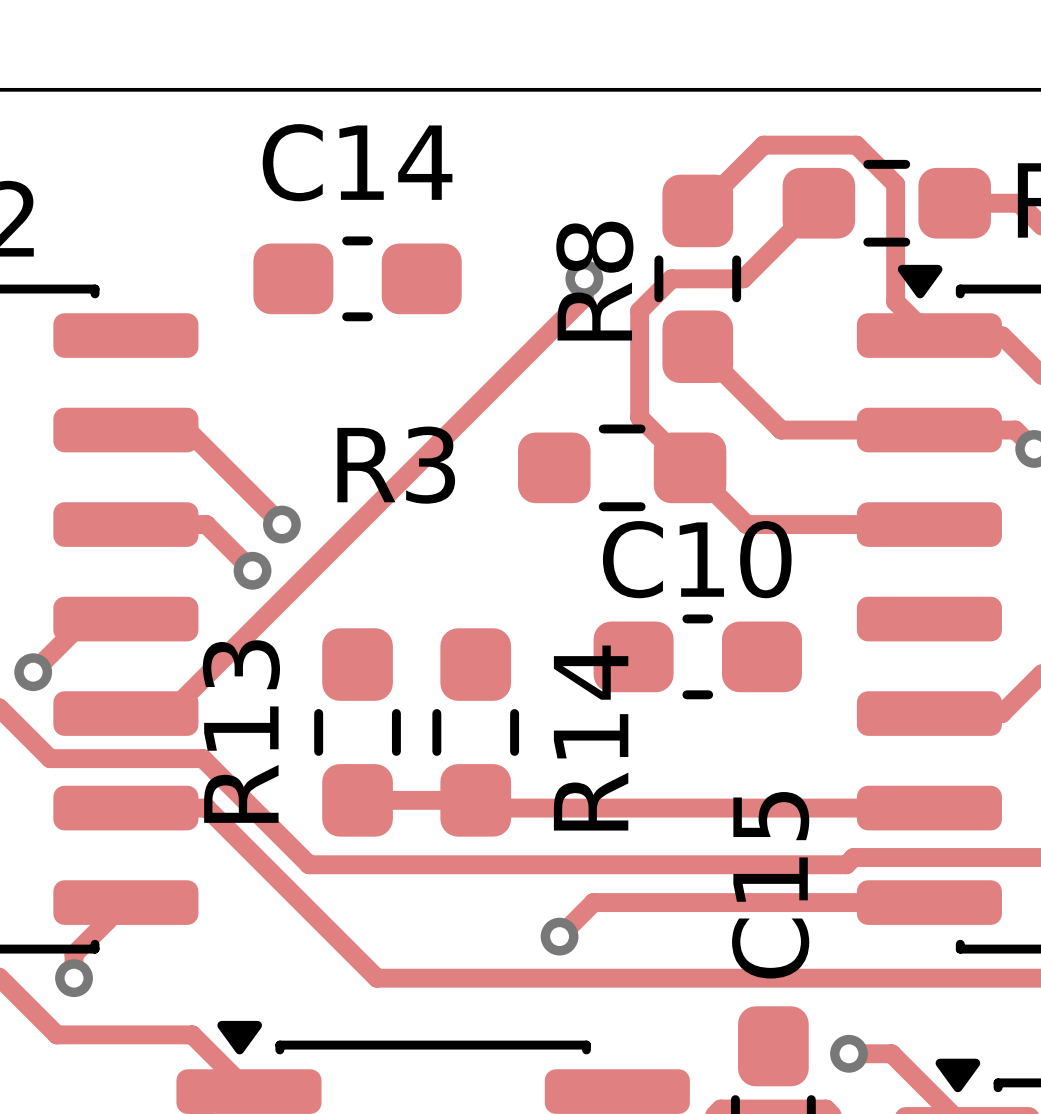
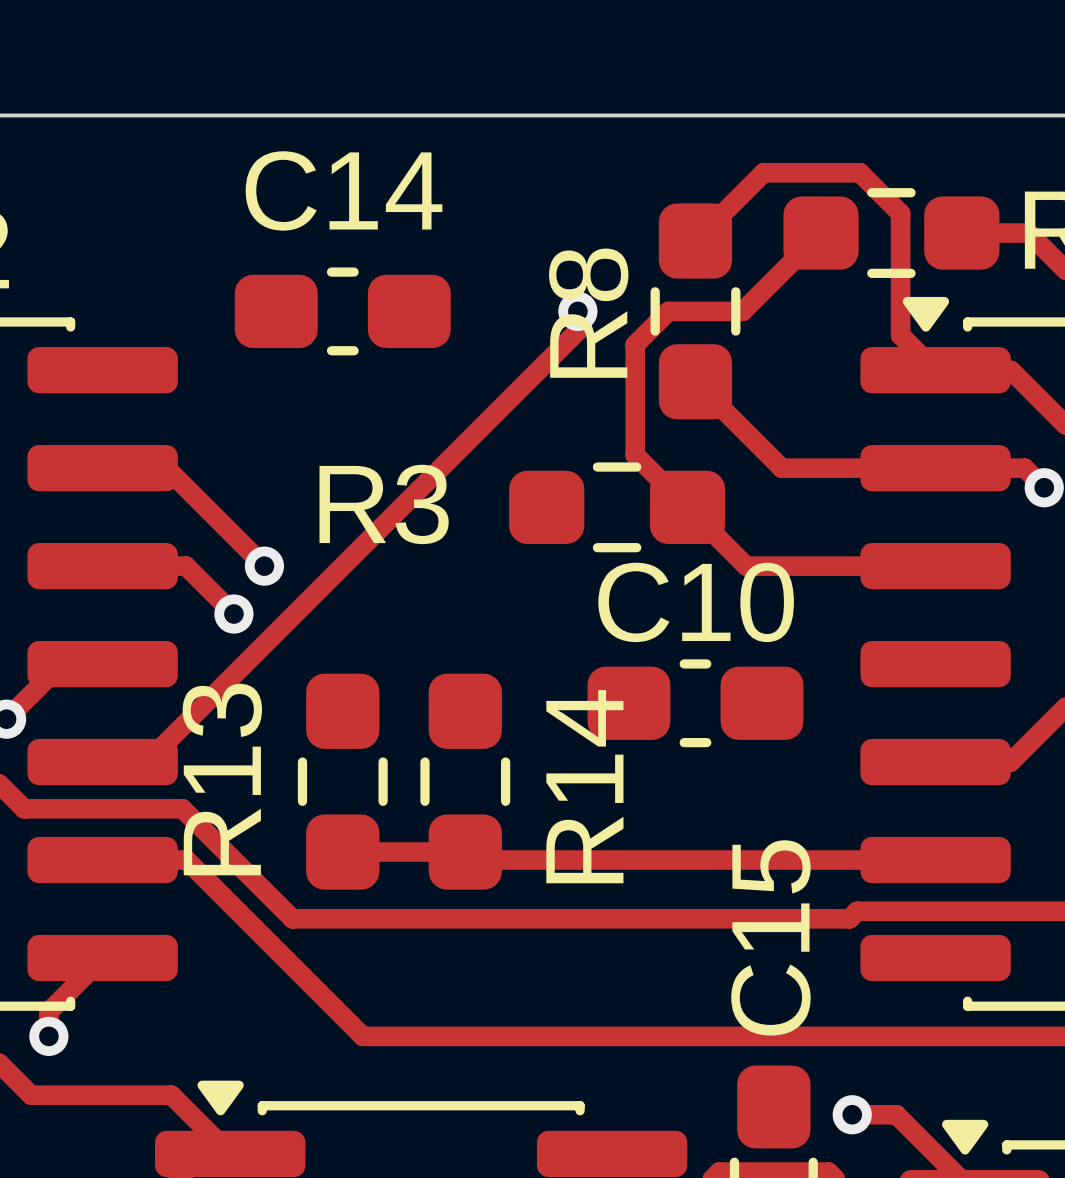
track: (929, 902) (593, 902) (559, 936) -> none
via: (559, 936) -> none

